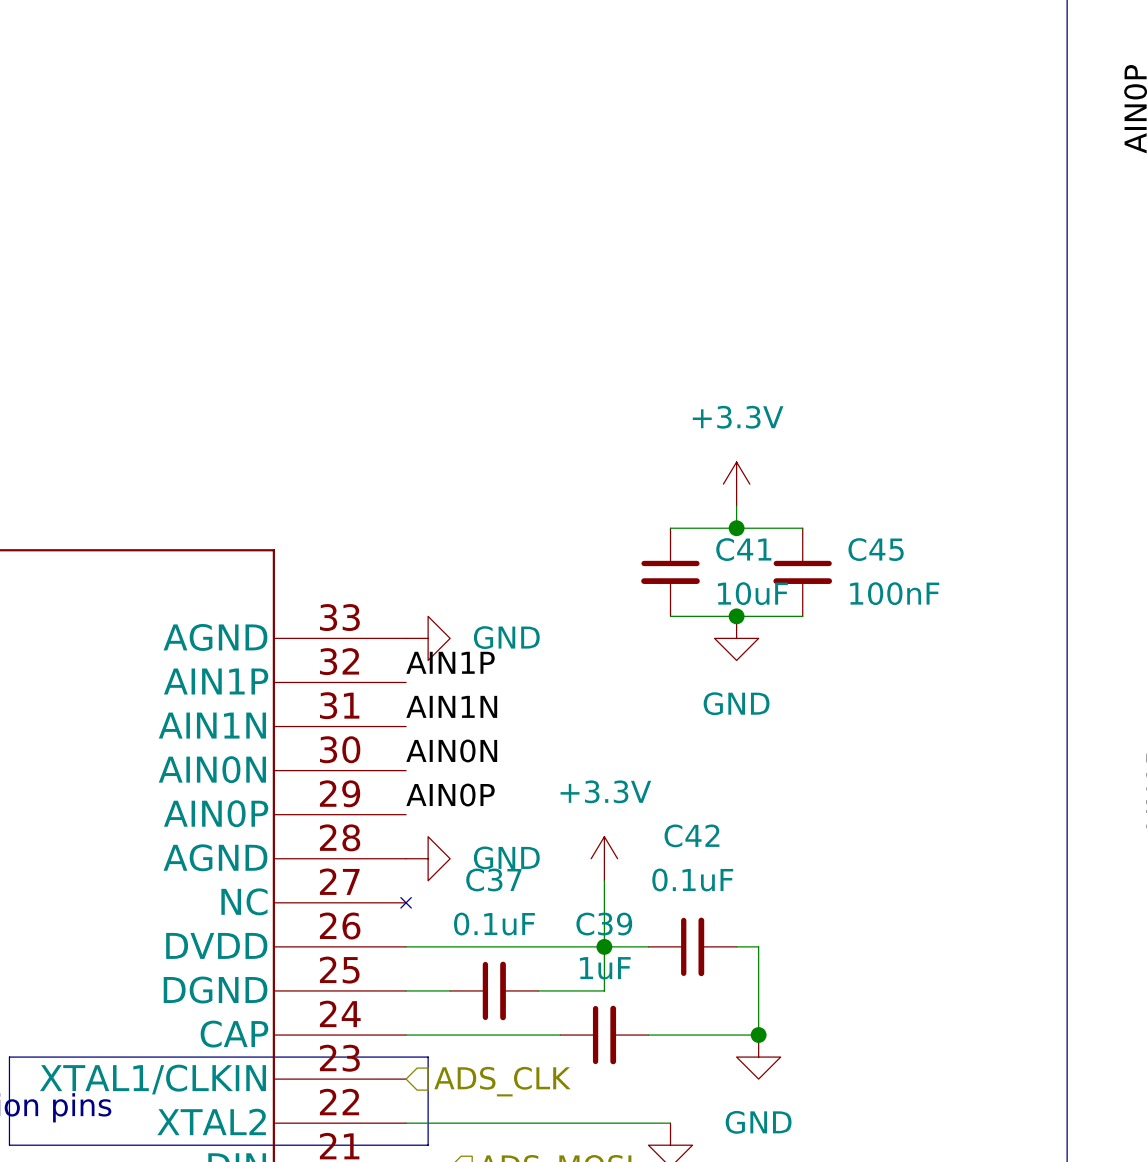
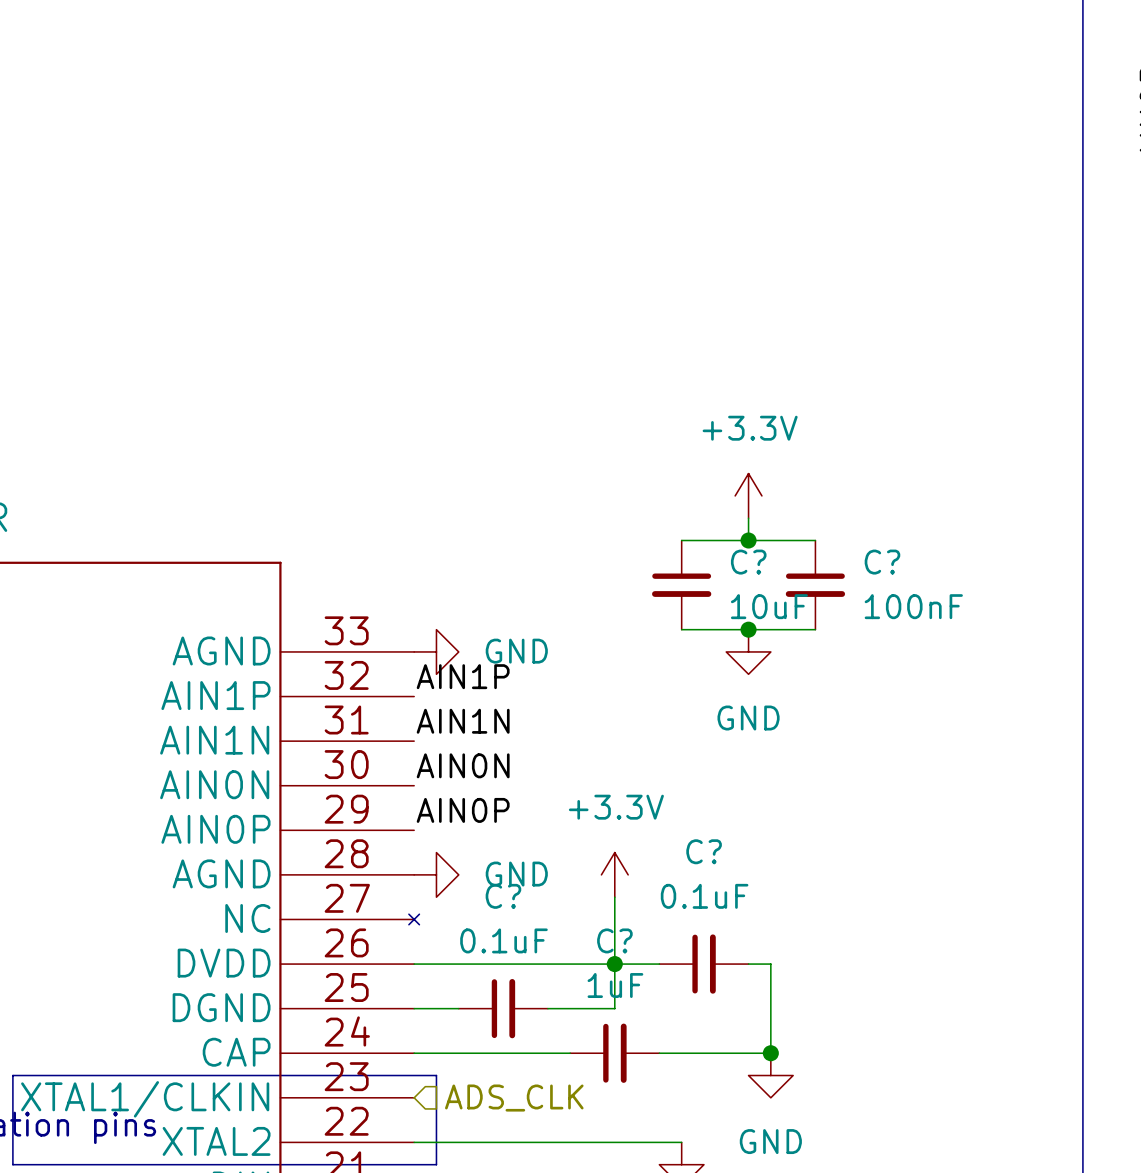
C41 name: C41 (743, 549) -> C? (748, 562)
C45 name: C45 (876, 549) -> C? (882, 562)
C42 name: C42 (691, 835) -> C? (704, 851)
C37 name: C37 (493, 879) -> C? (503, 896)
C39 name: C39 (604, 924) -> C? (614, 940)

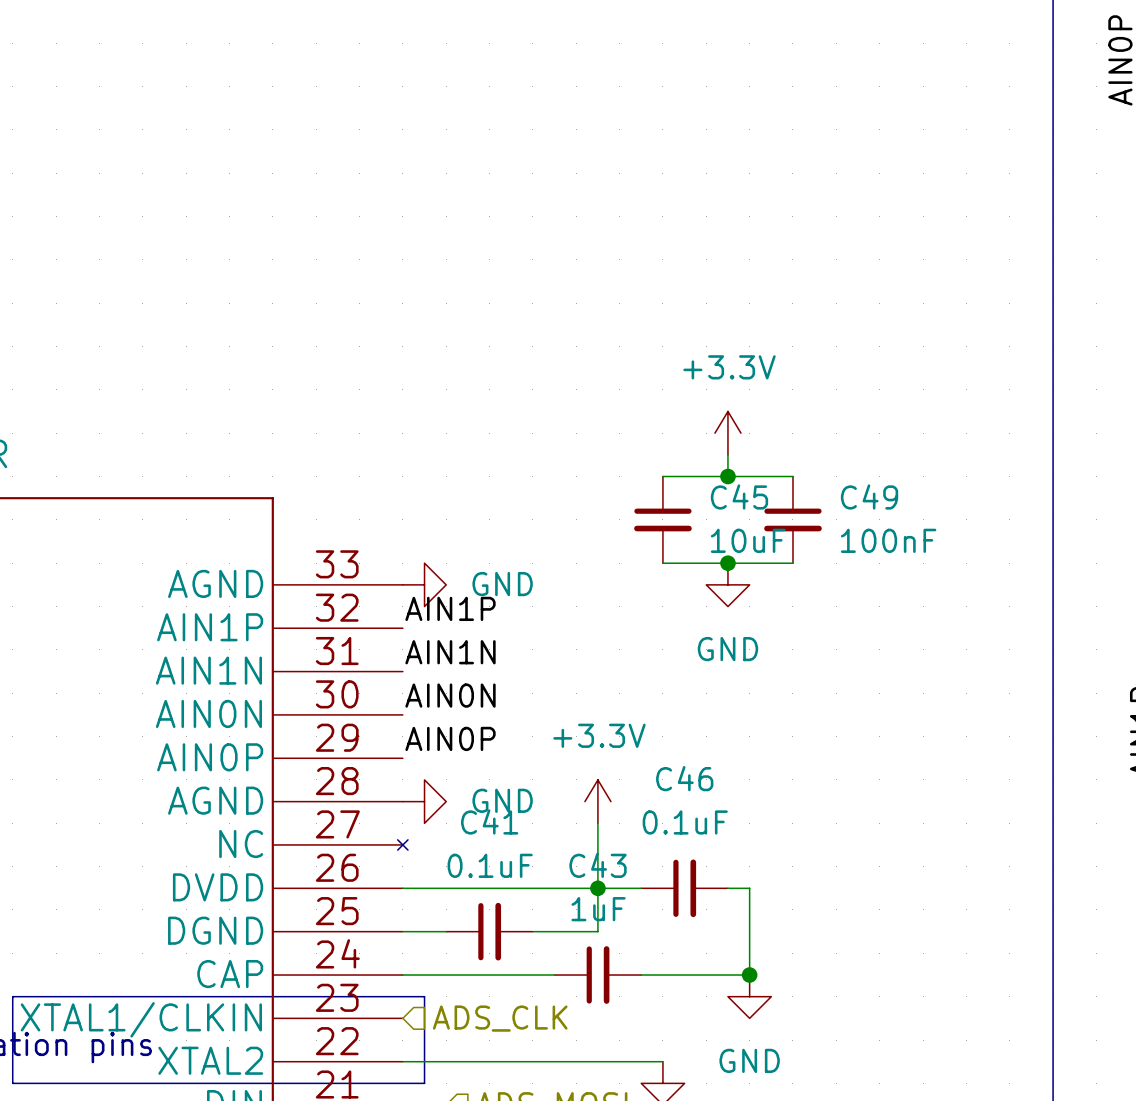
C? name: C? (748, 562) -> C45 (739, 496)
C? name: C? (882, 562) -> C49 (869, 496)
C? name: C? (704, 851) -> C46 (684, 778)
C? name: C? (503, 896) -> C41 (489, 821)
C? name: C? (614, 940) -> C43 (598, 865)

